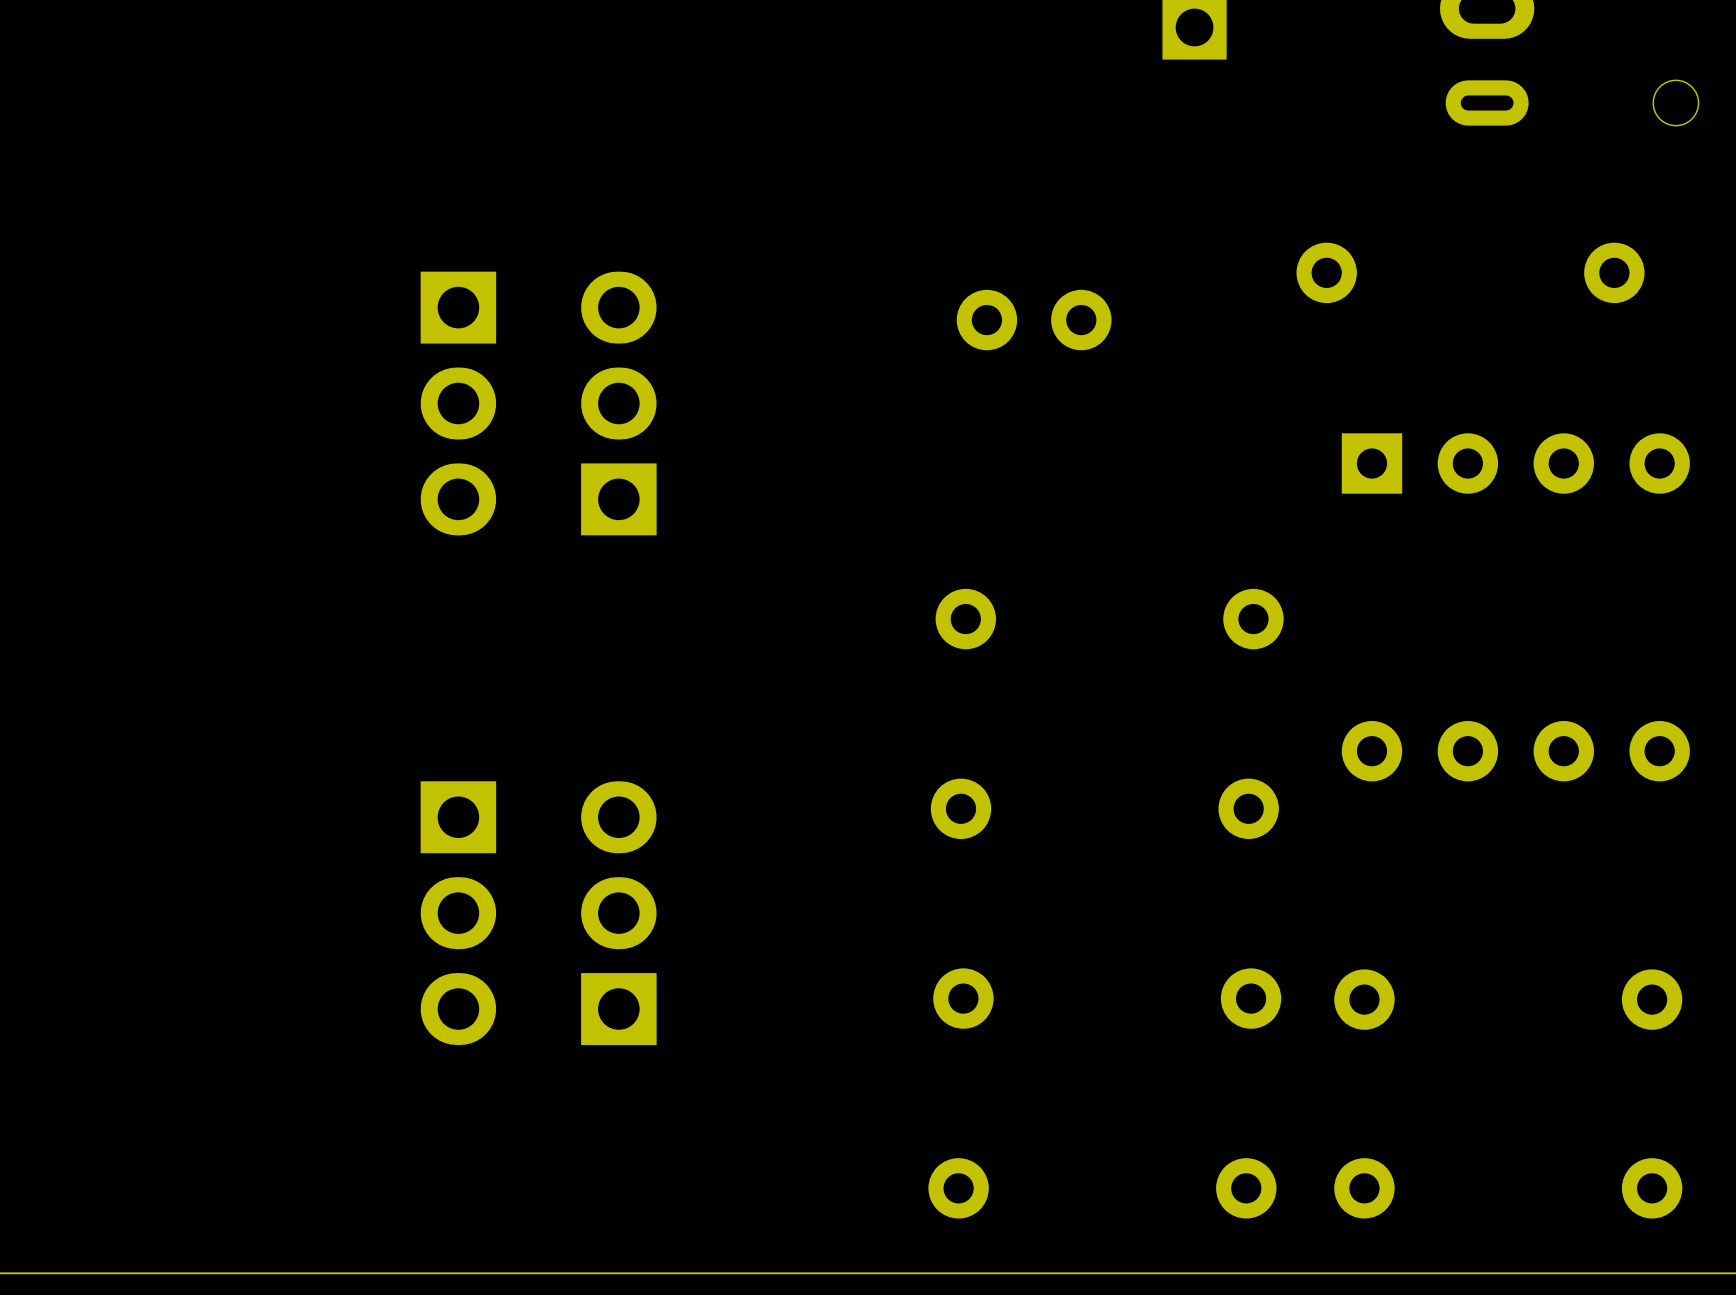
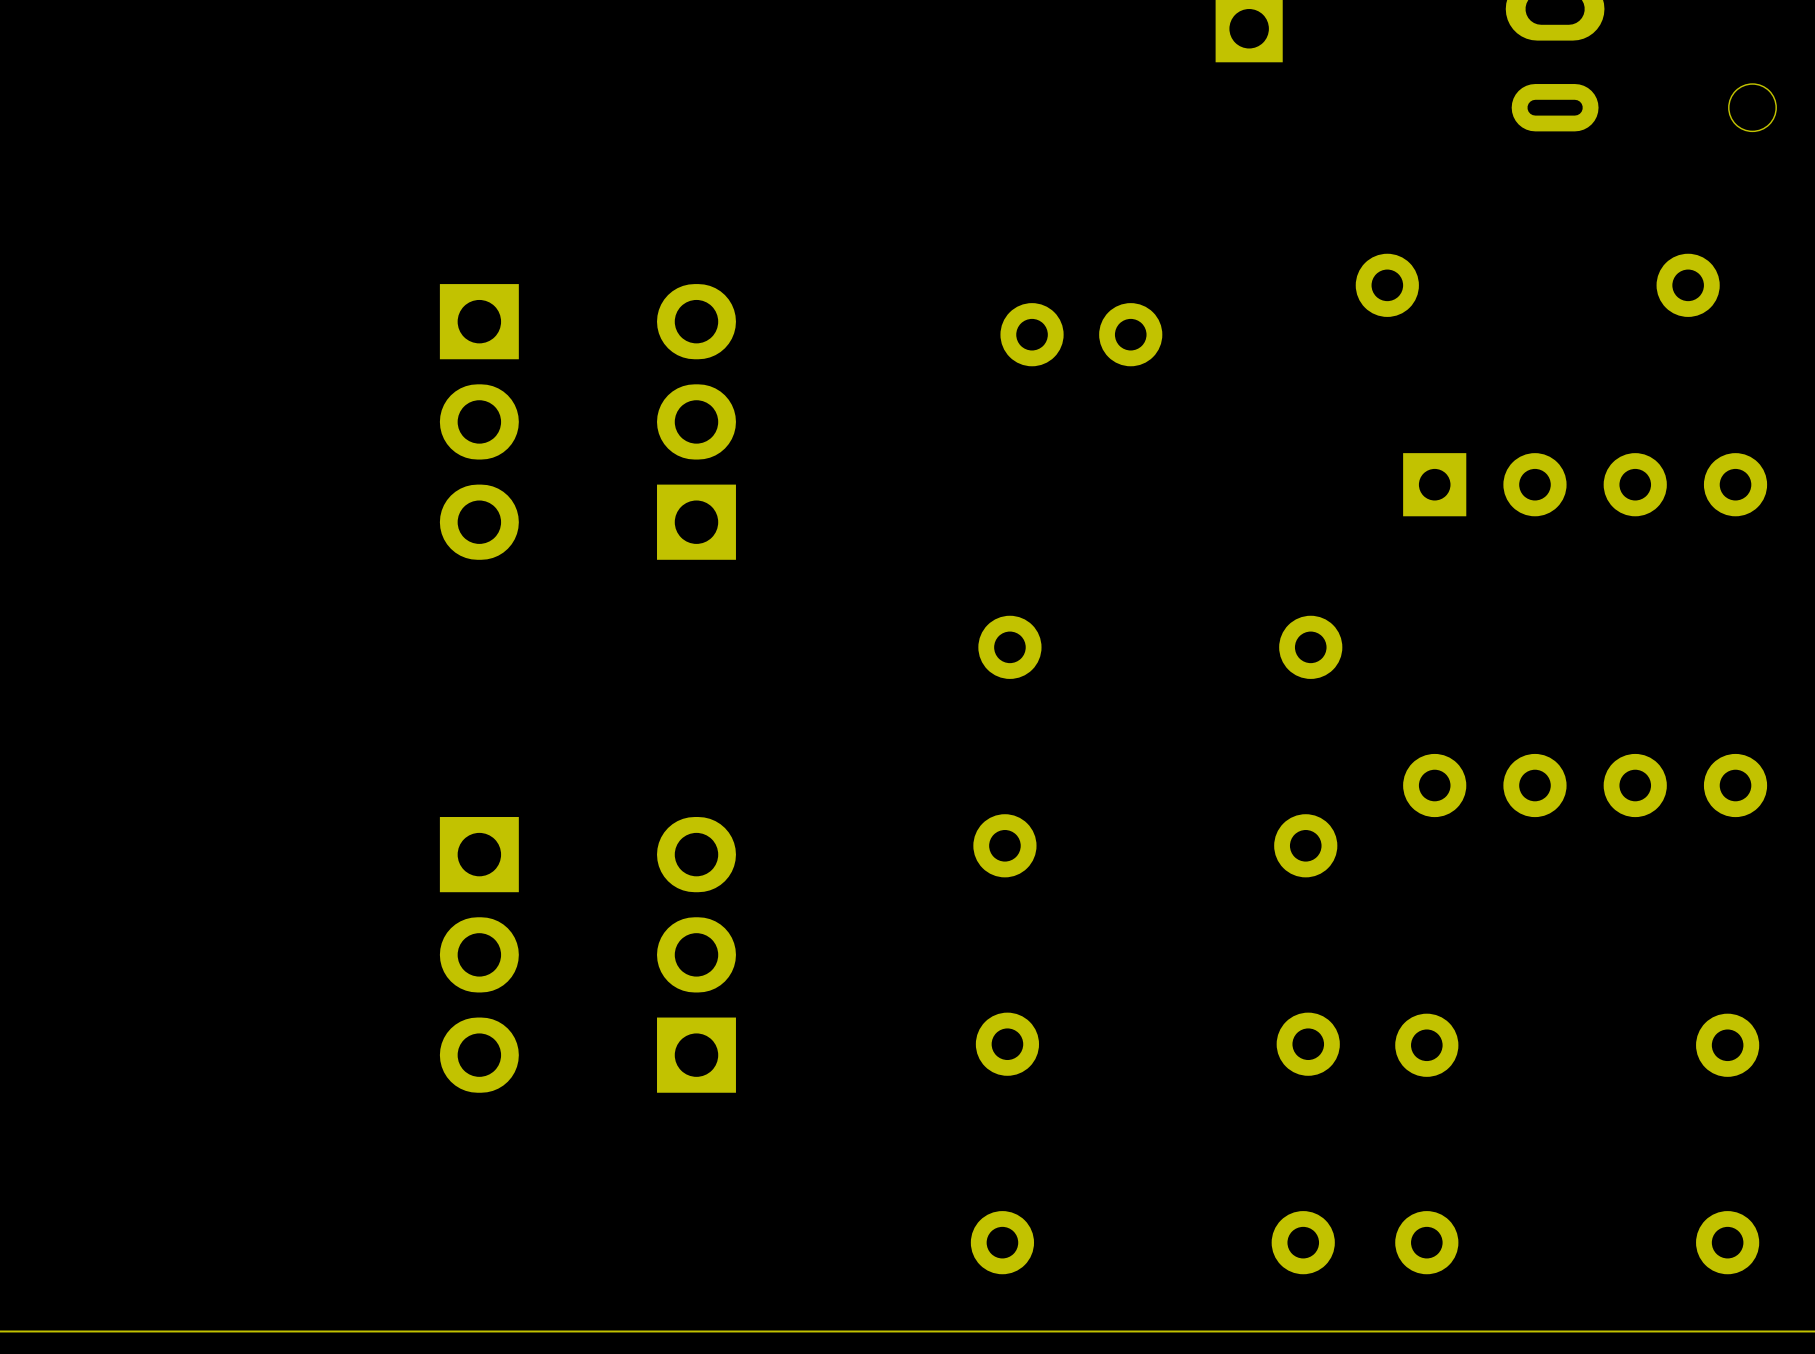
part position: (618, 403) -> (696, 421)
part position: (618, 913) -> (696, 954)

